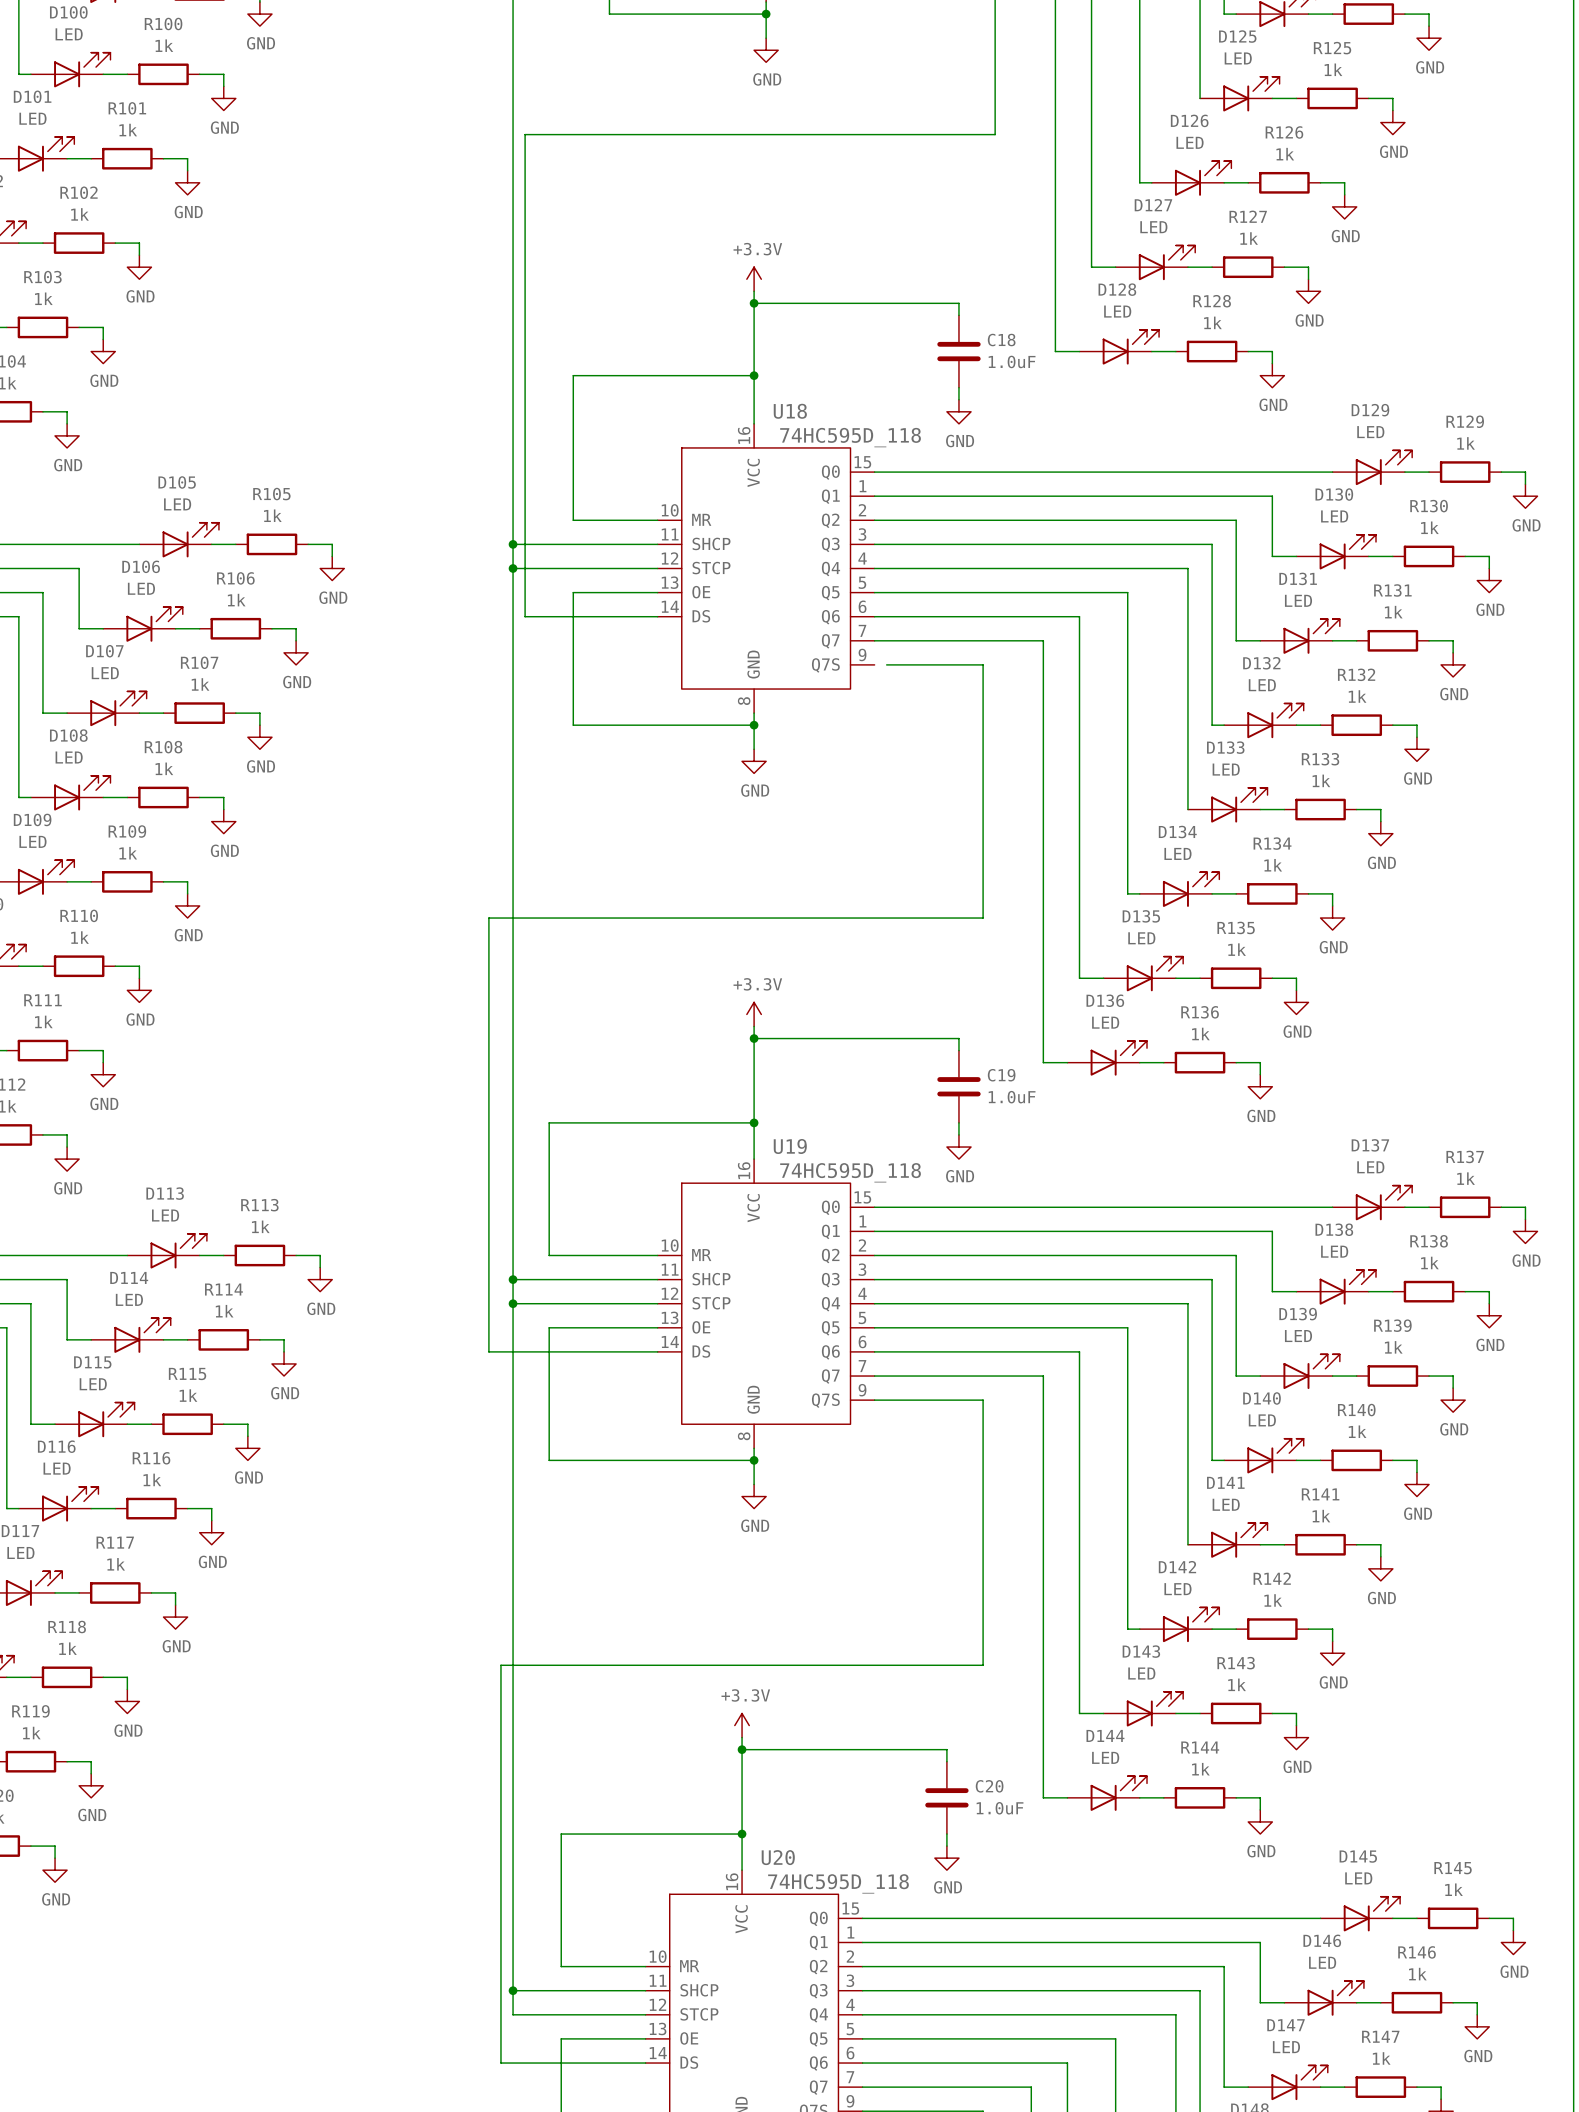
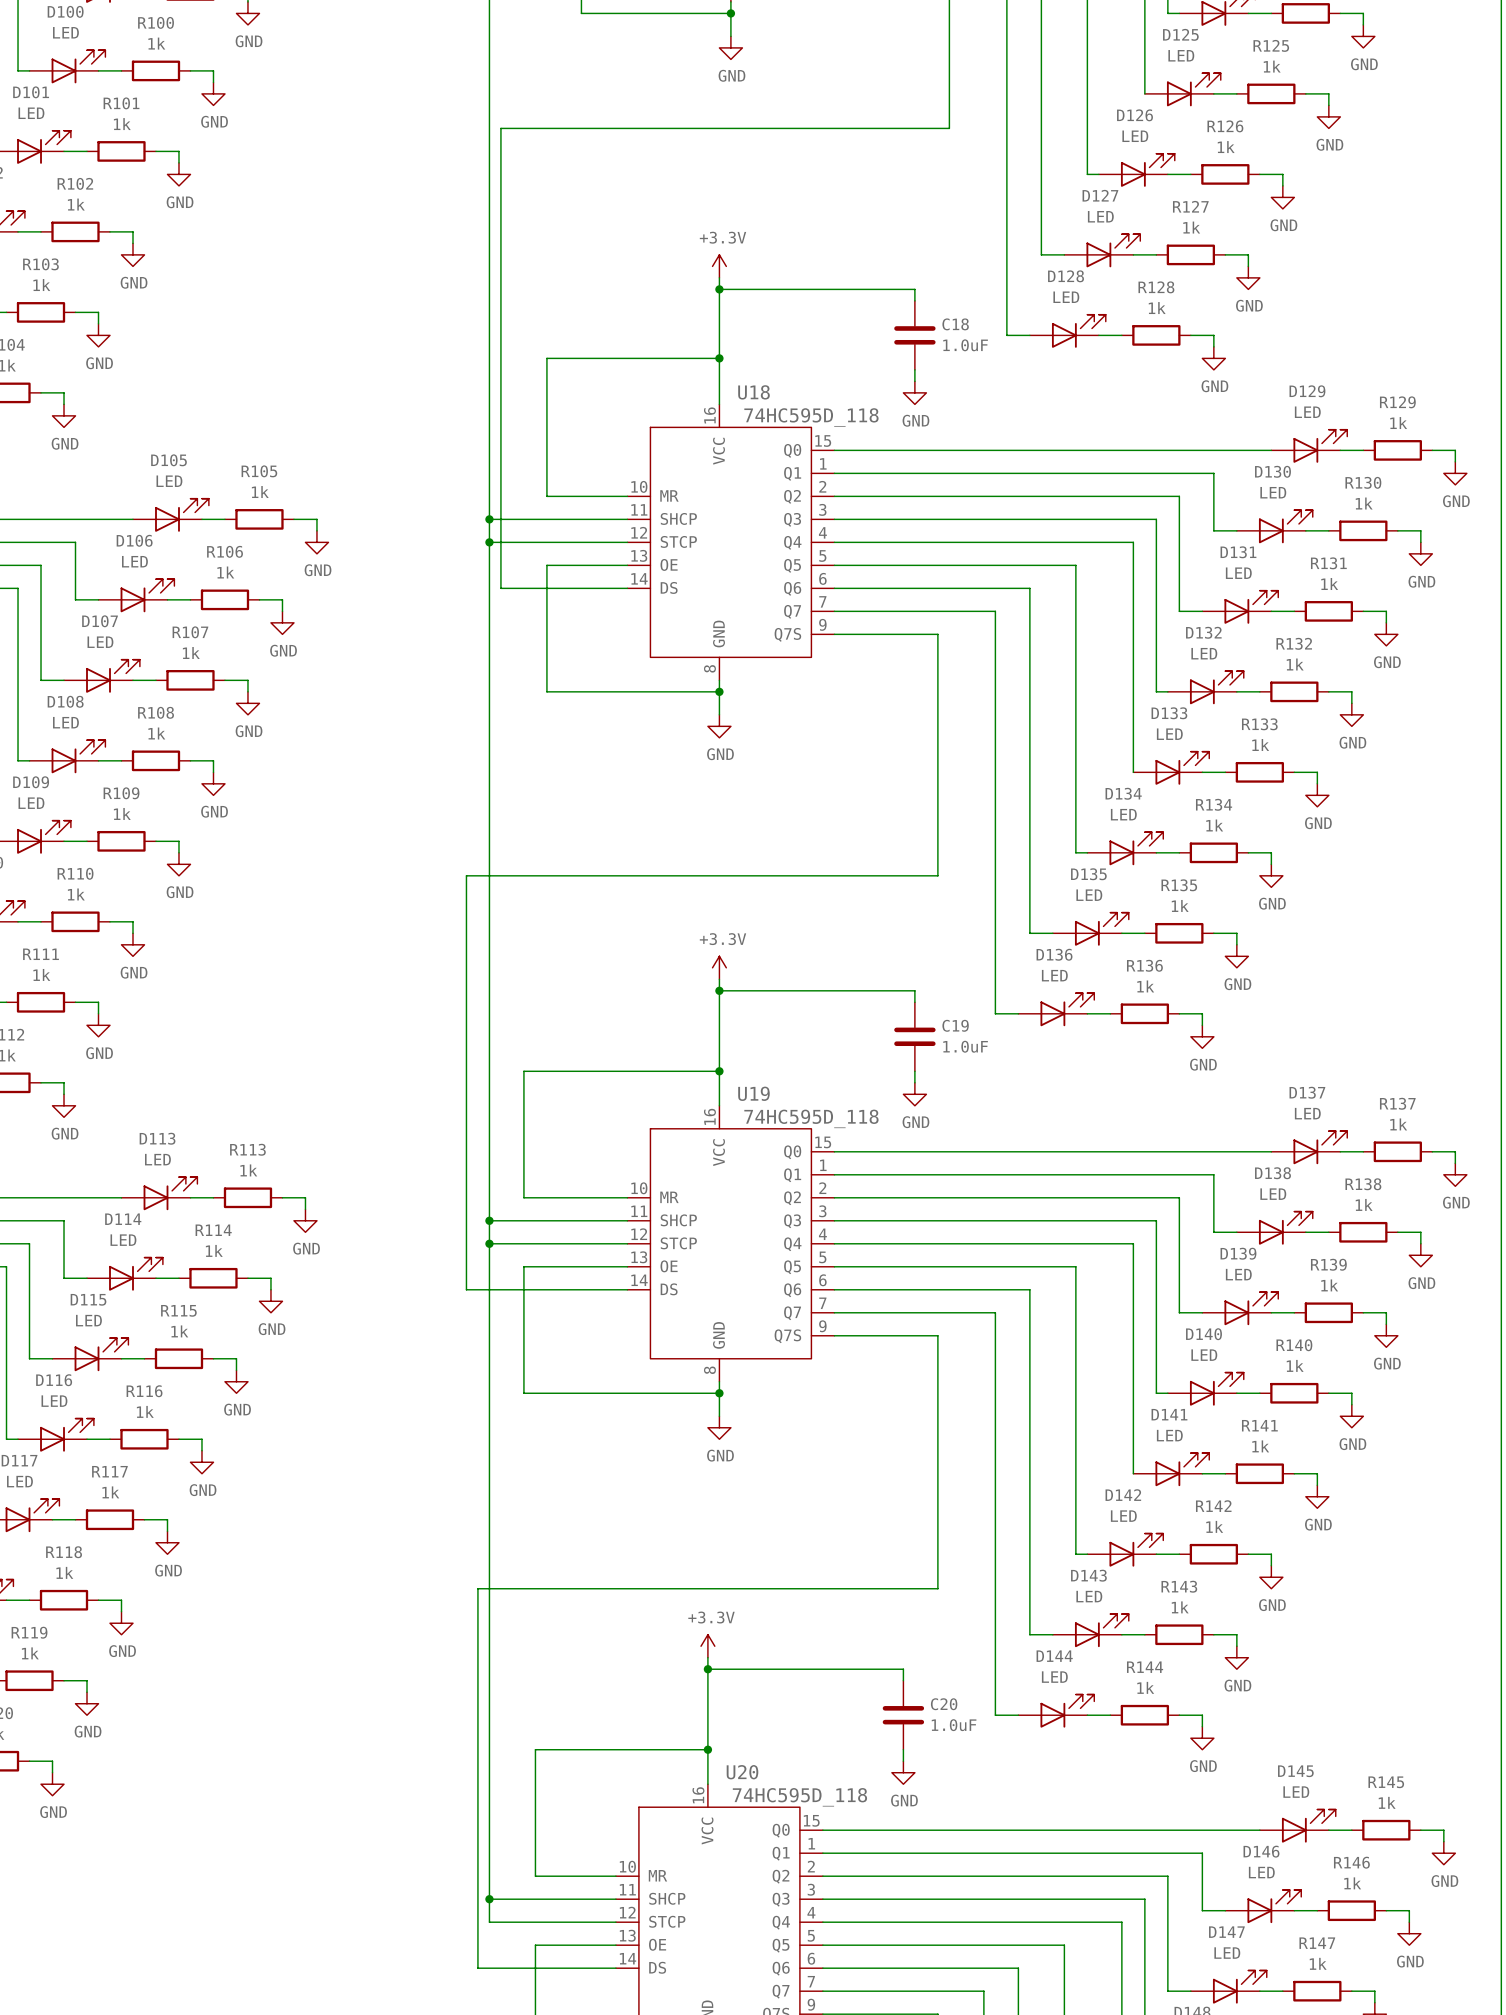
wire: none -> (834, 634) (845, 634)

